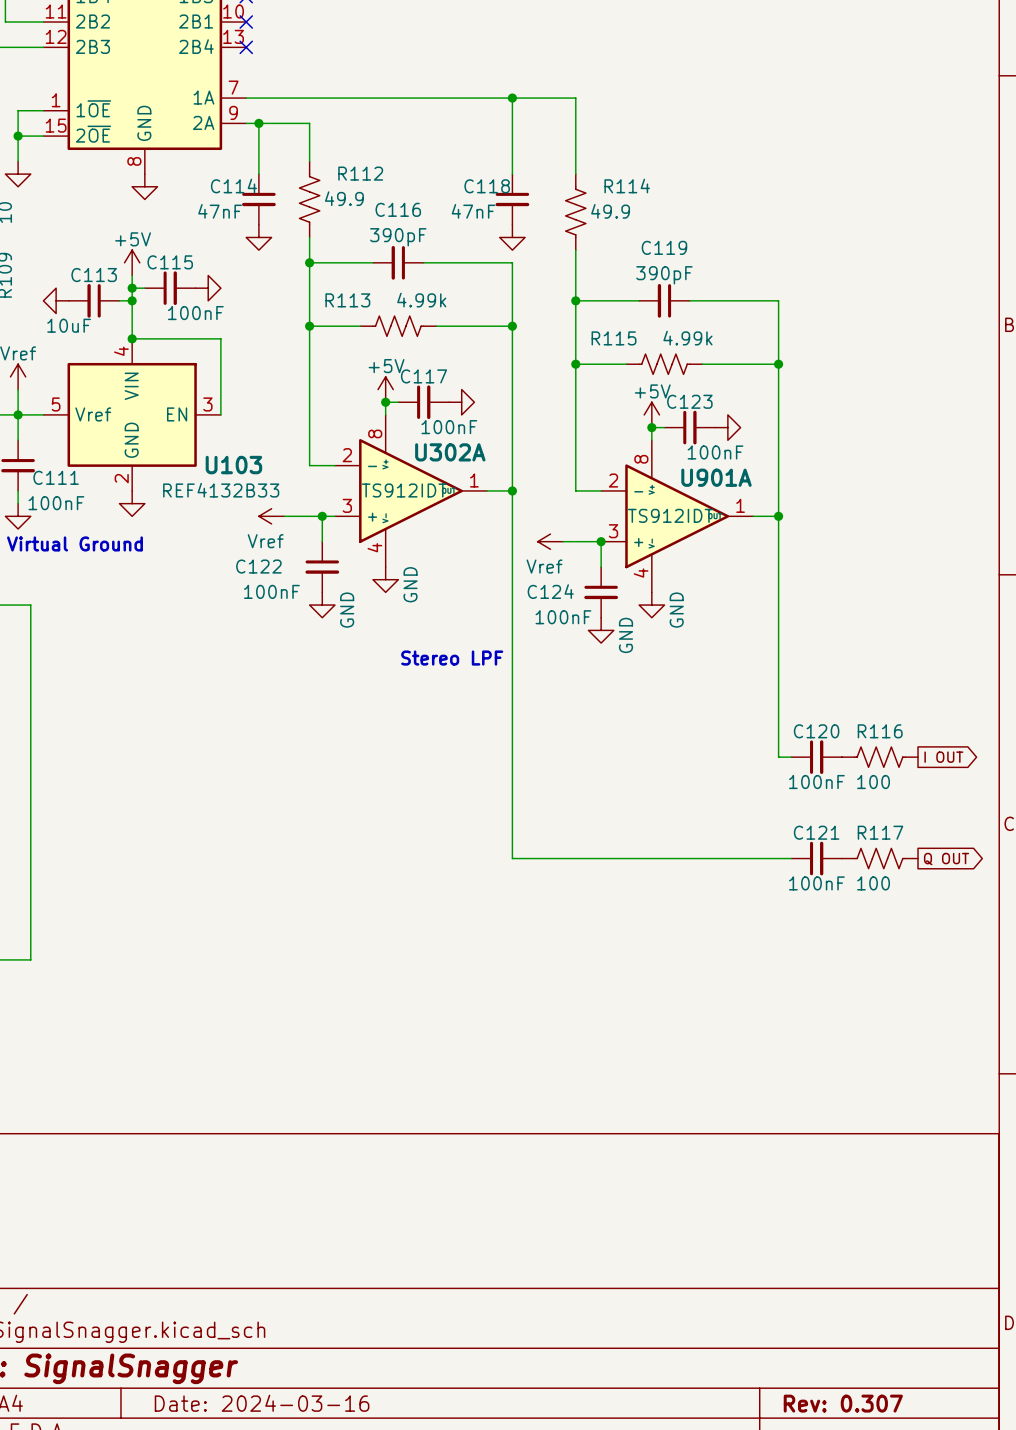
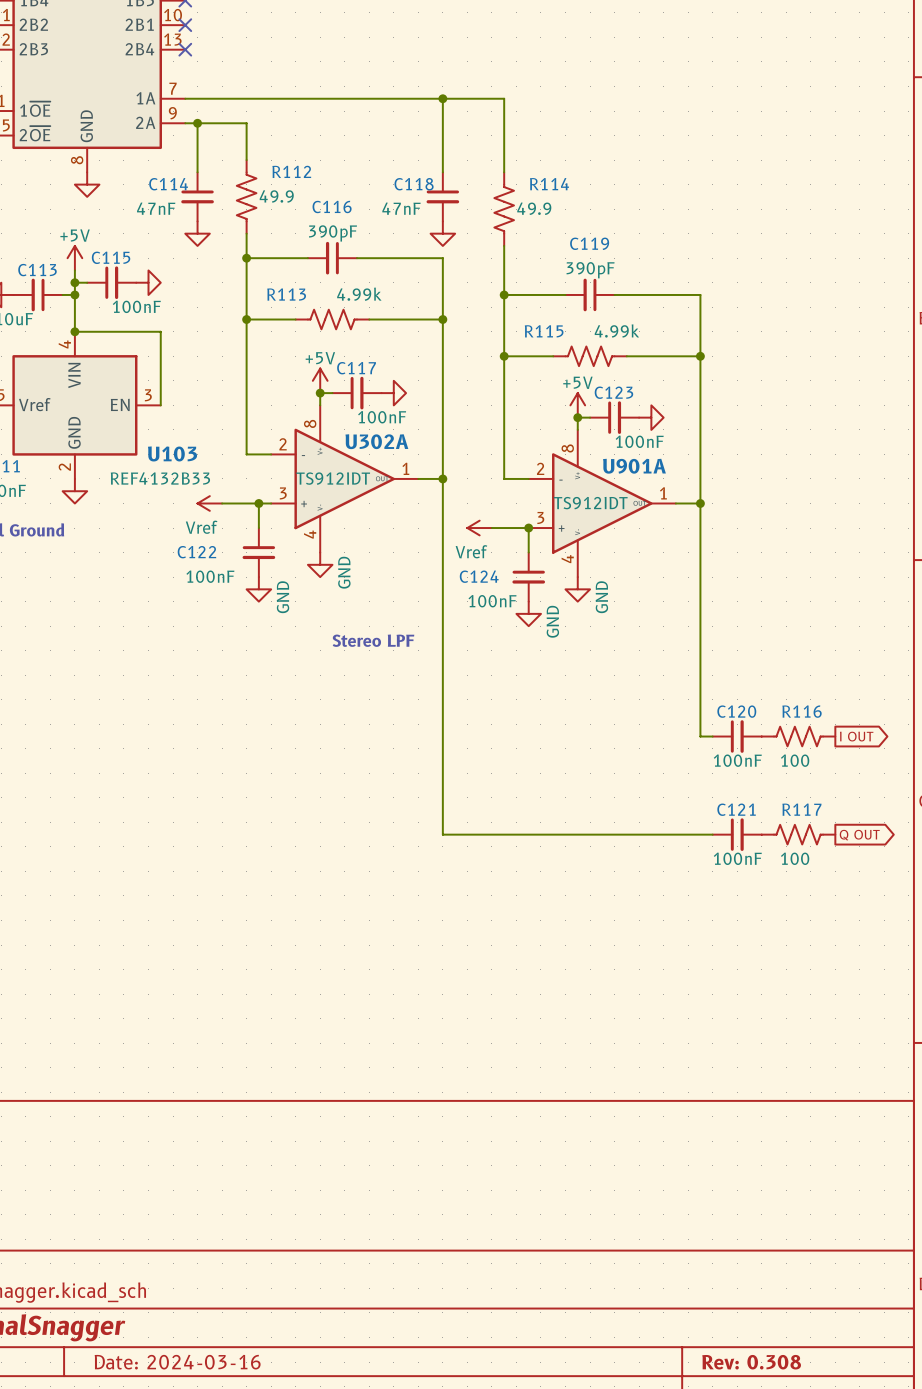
title block: Rev: 0.307 (843, 1403) -> Rev: 0.308 (751, 1362)

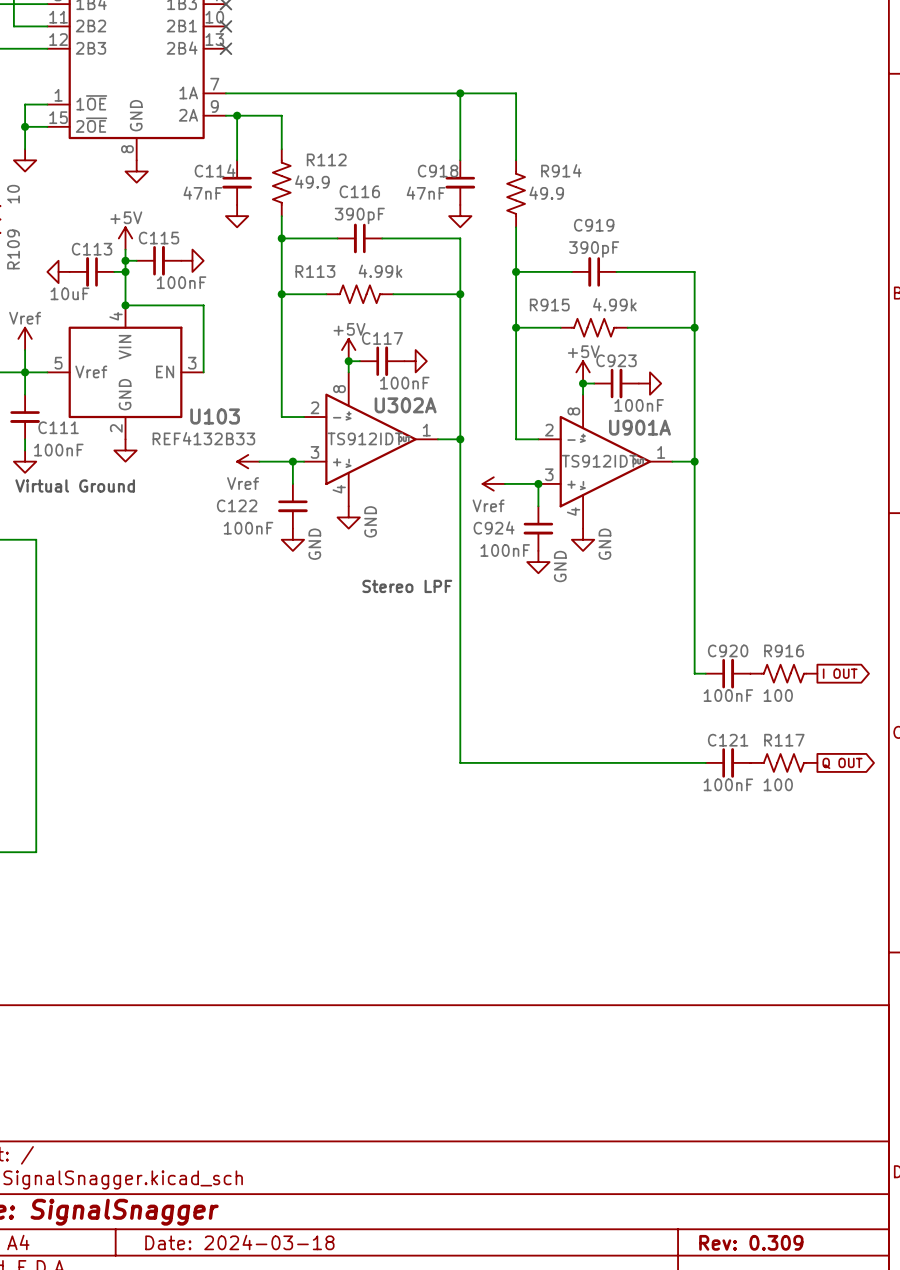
C118 name: C118 (414, 184) -> C918 (438, 171)
R114 name: R114 (549, 184) -> R914 (561, 170)
C119 name: C119 (589, 243) -> C919 (594, 225)
R115 name: R115 (544, 331) -> R915 (549, 304)
C123 name: C123 (613, 392) -> C923 (616, 360)
C124 name: C124 (479, 576) -> C924 (494, 527)
C120 name: C120 (736, 711) -> C920 (728, 650)
R116 name: R116 (802, 711) -> R916 (784, 650)
title block: Date: 2024-03-16 (177, 1362) -> Date: 2024-03-18 (239, 1242)
title block: Rev: 0.308 (751, 1362) -> Rev: 0.309 (751, 1242)

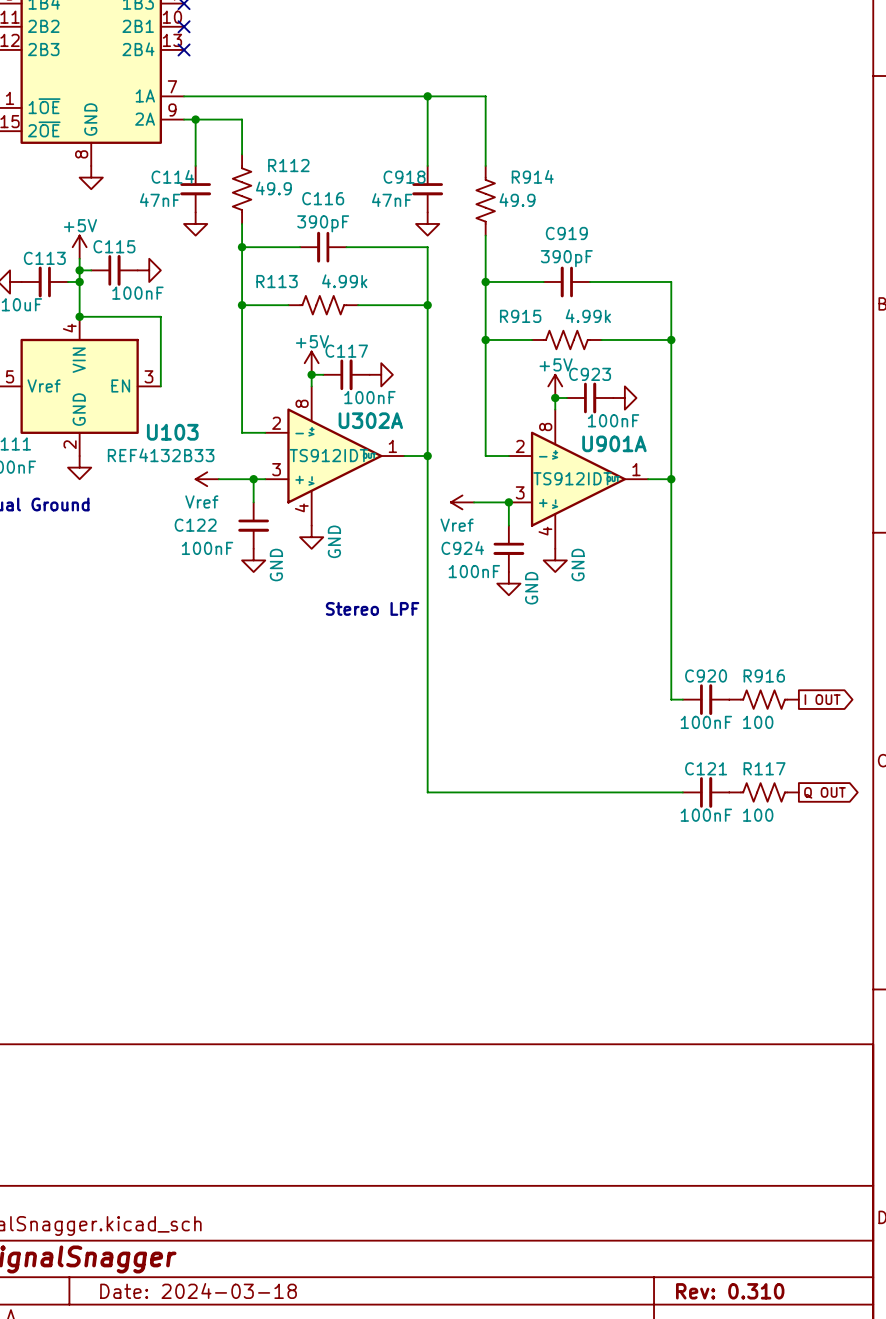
title block: Rev: 0.309 (751, 1242) -> Rev: 0.310 (730, 1291)

